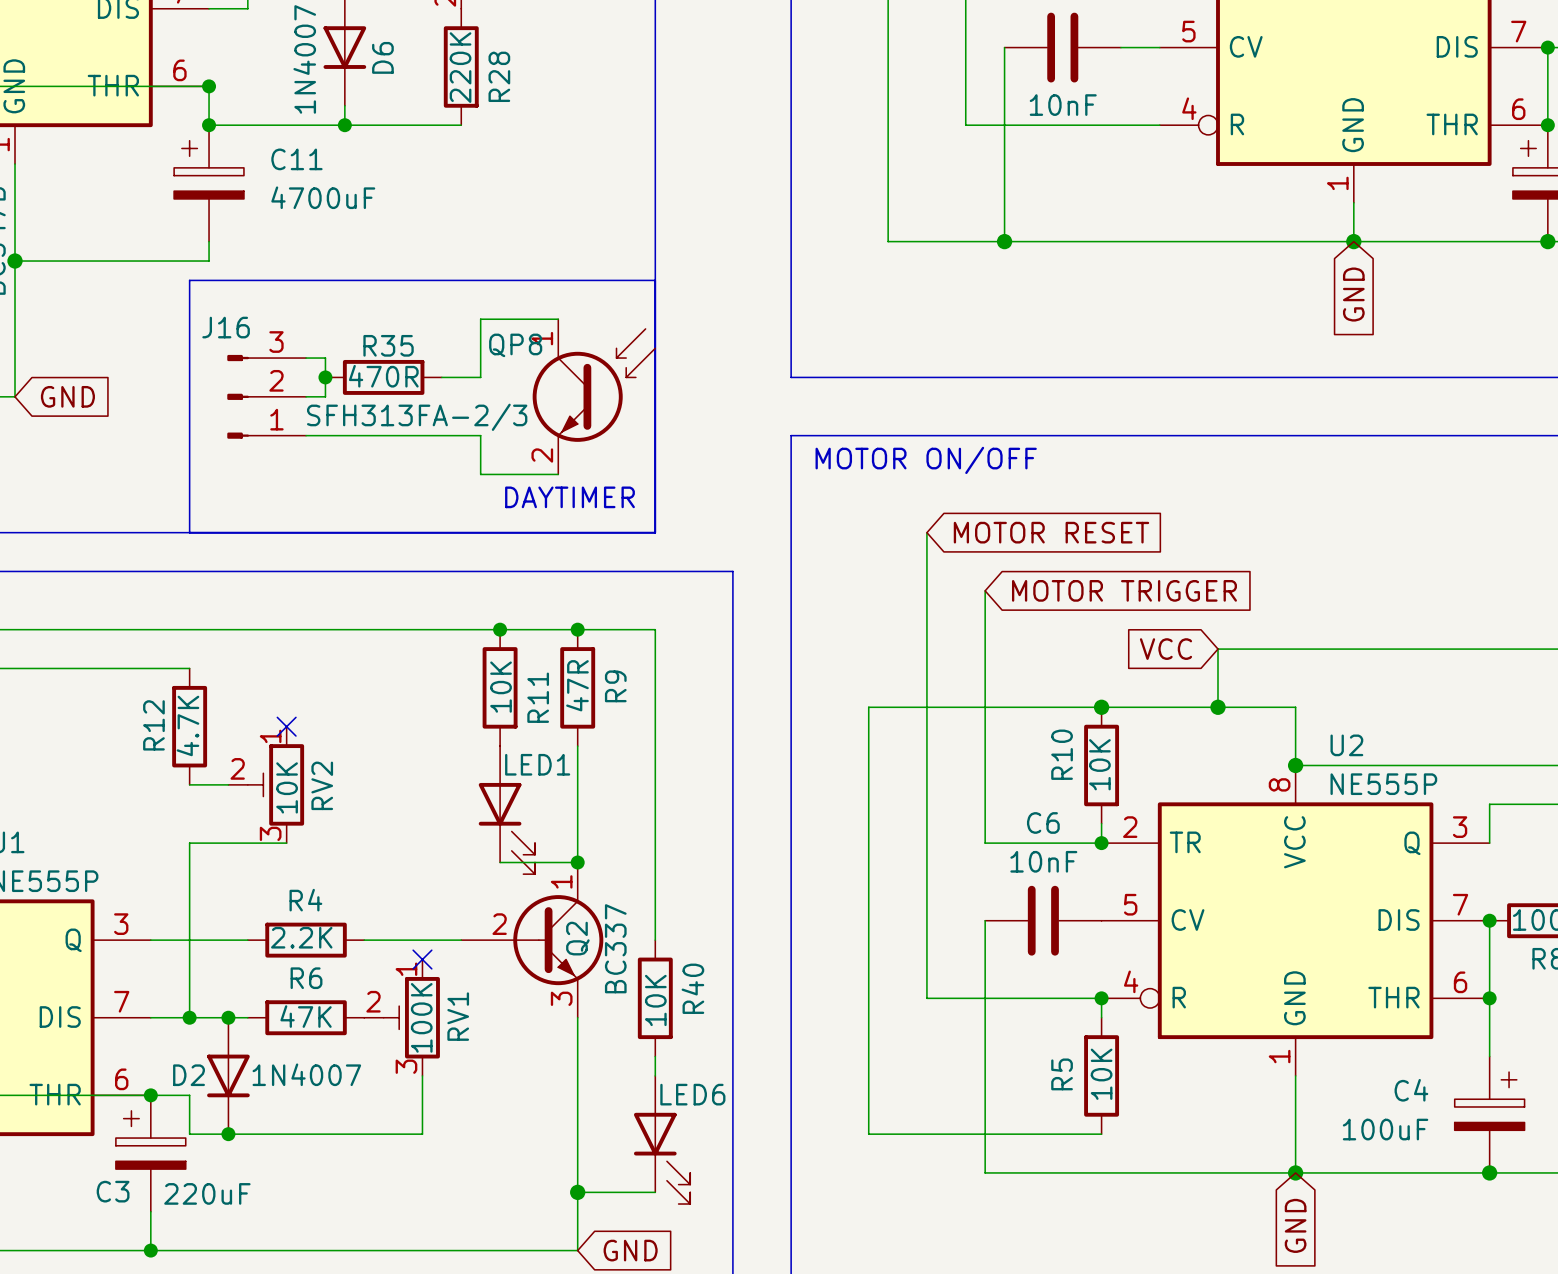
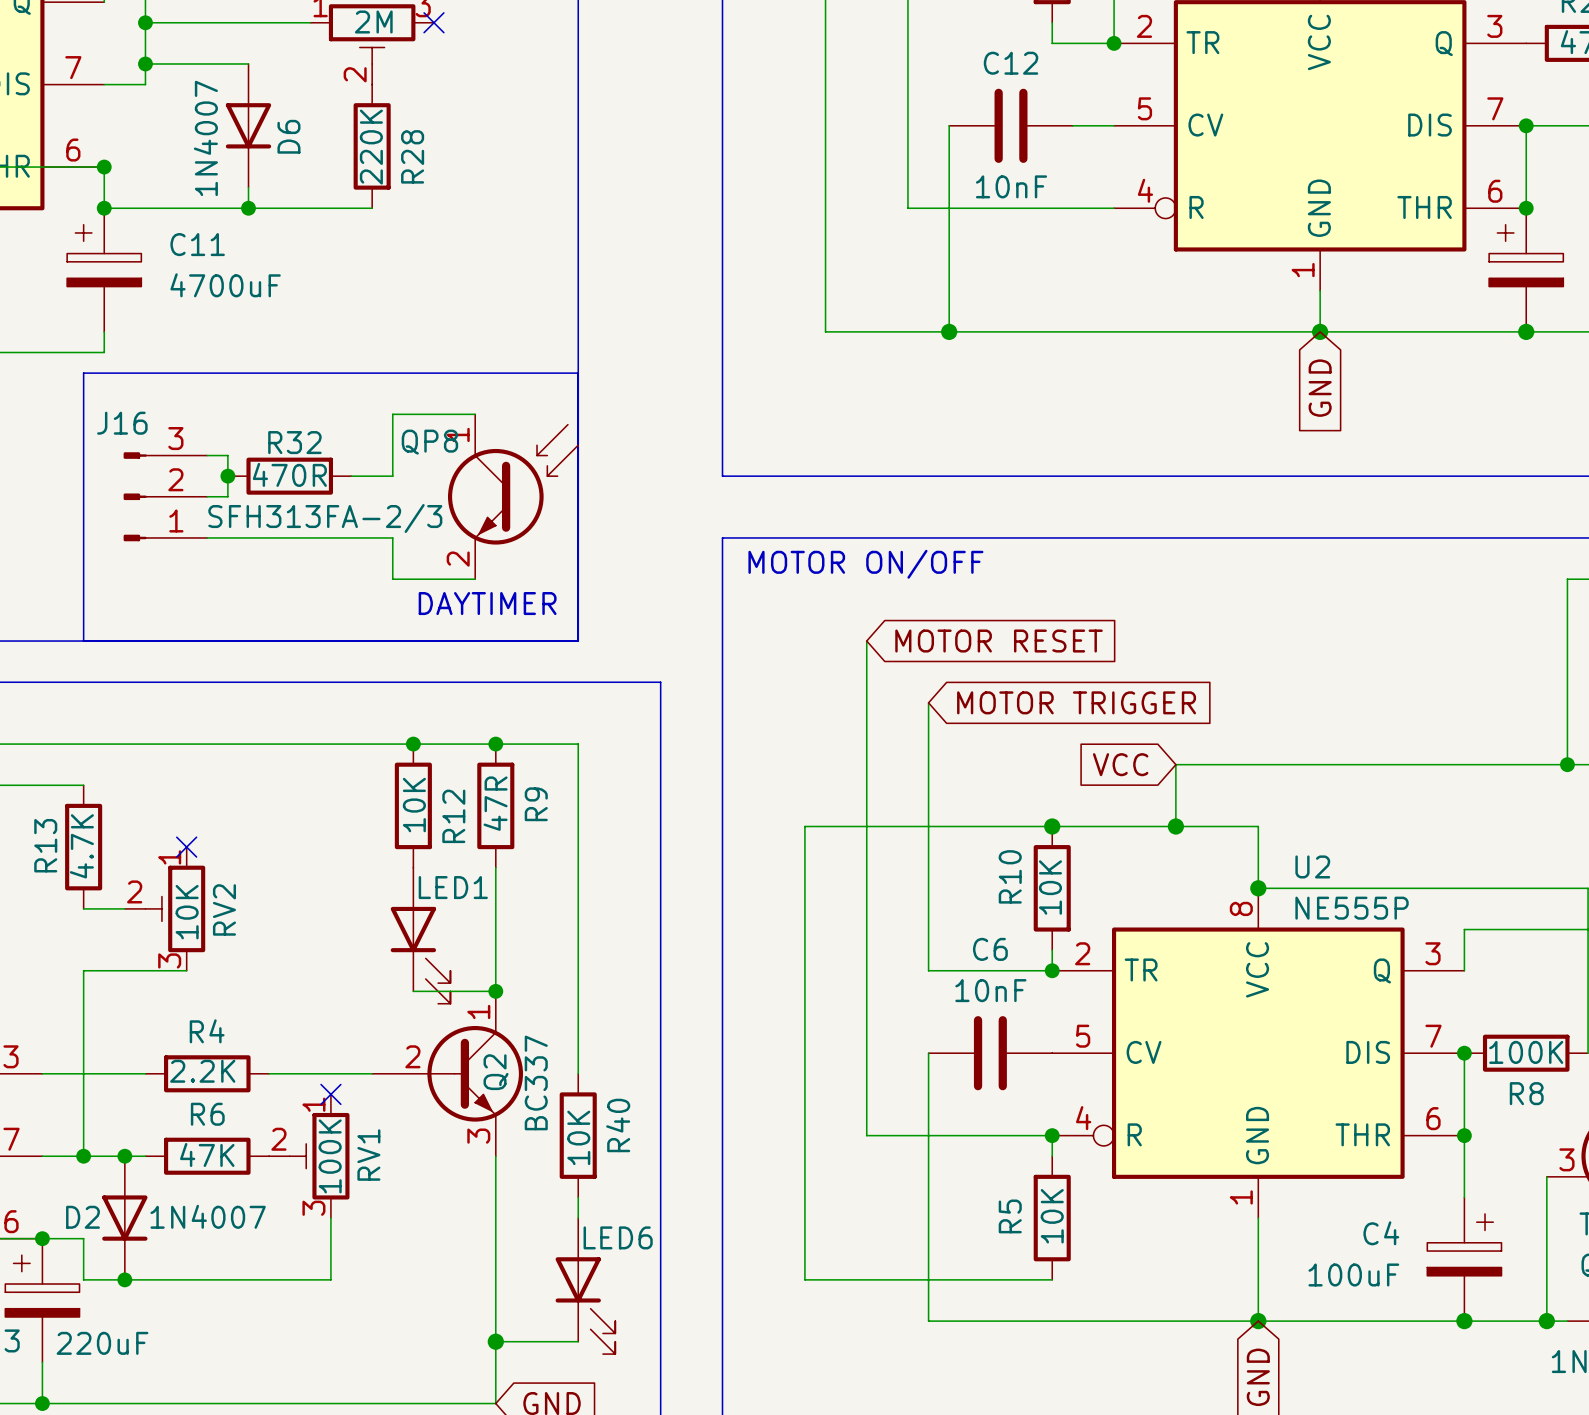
R35 name: R35 (388, 345) -> R32 (294, 442)
R11 name: R11 (538, 697) -> R12 (453, 816)
R12 name: R12 (153, 725) -> R13 (45, 845)

